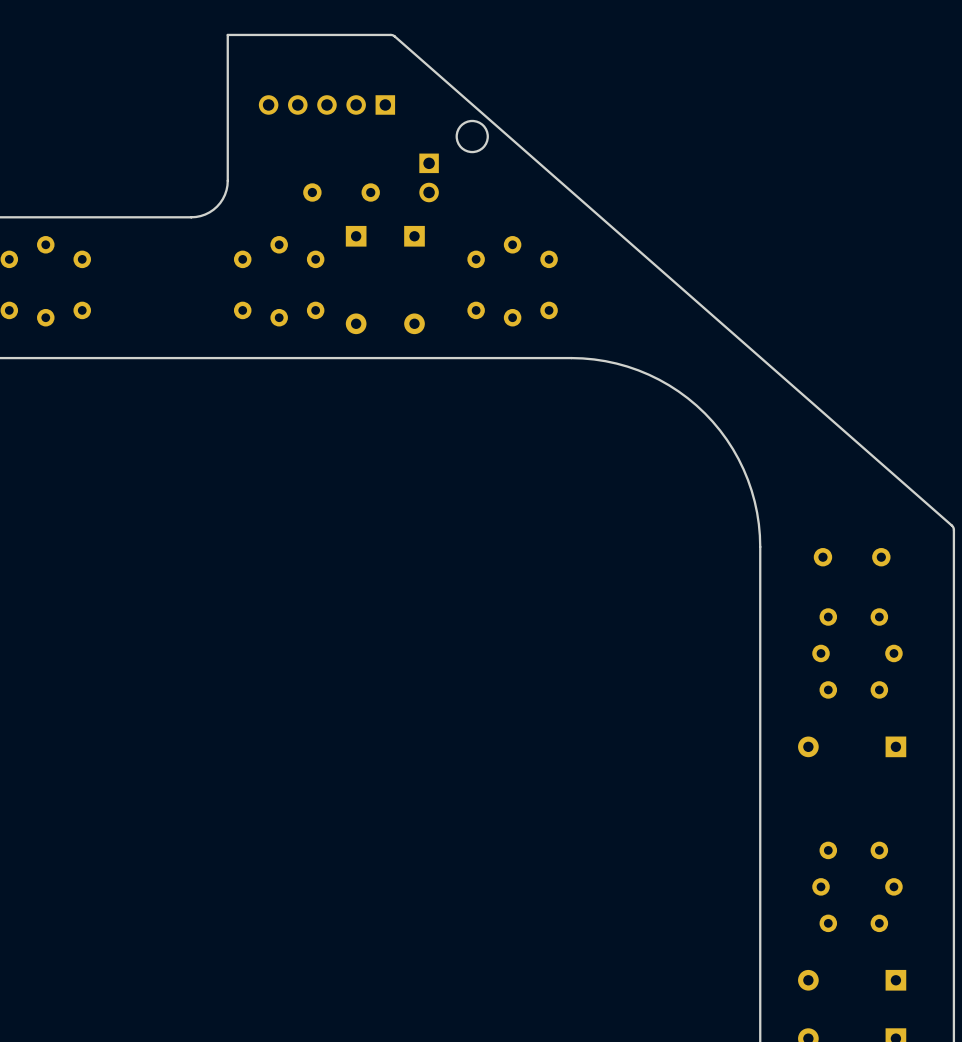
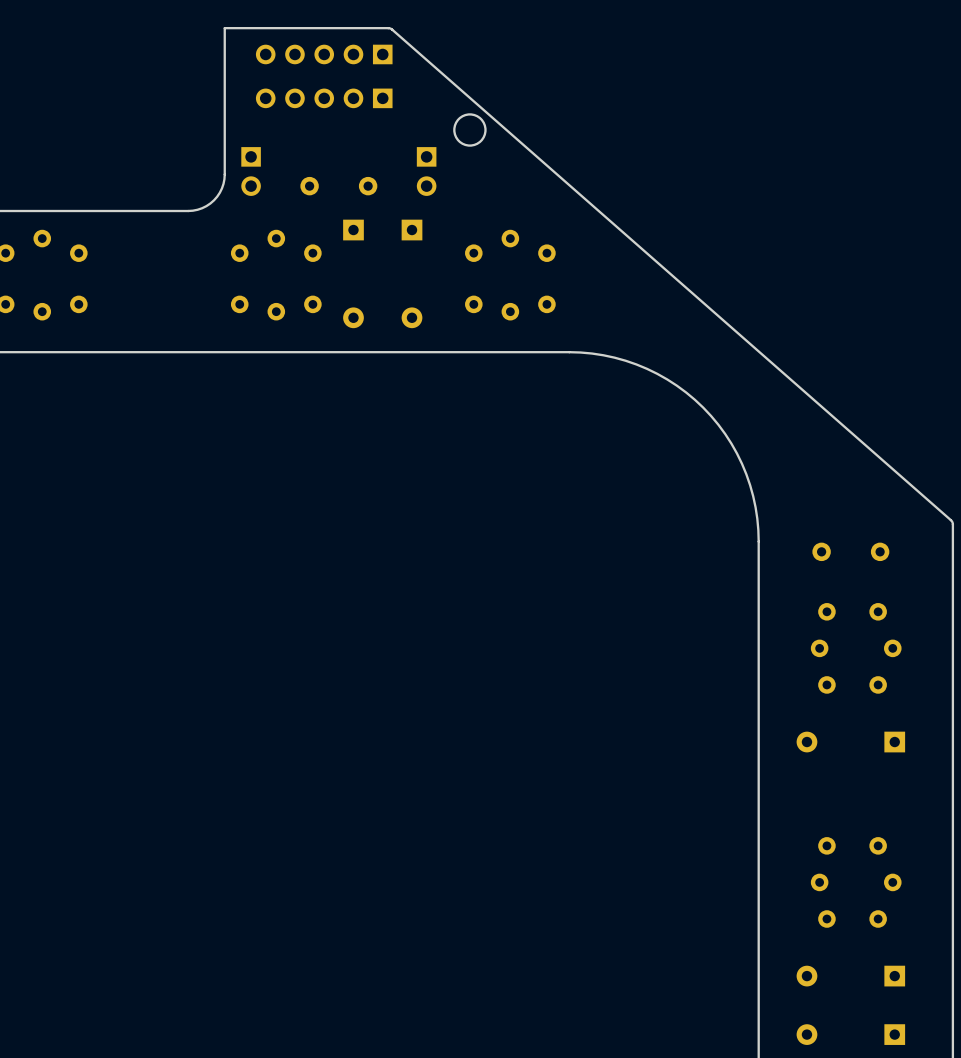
part: none -> (324, 54)
part: none -> (251, 171)

